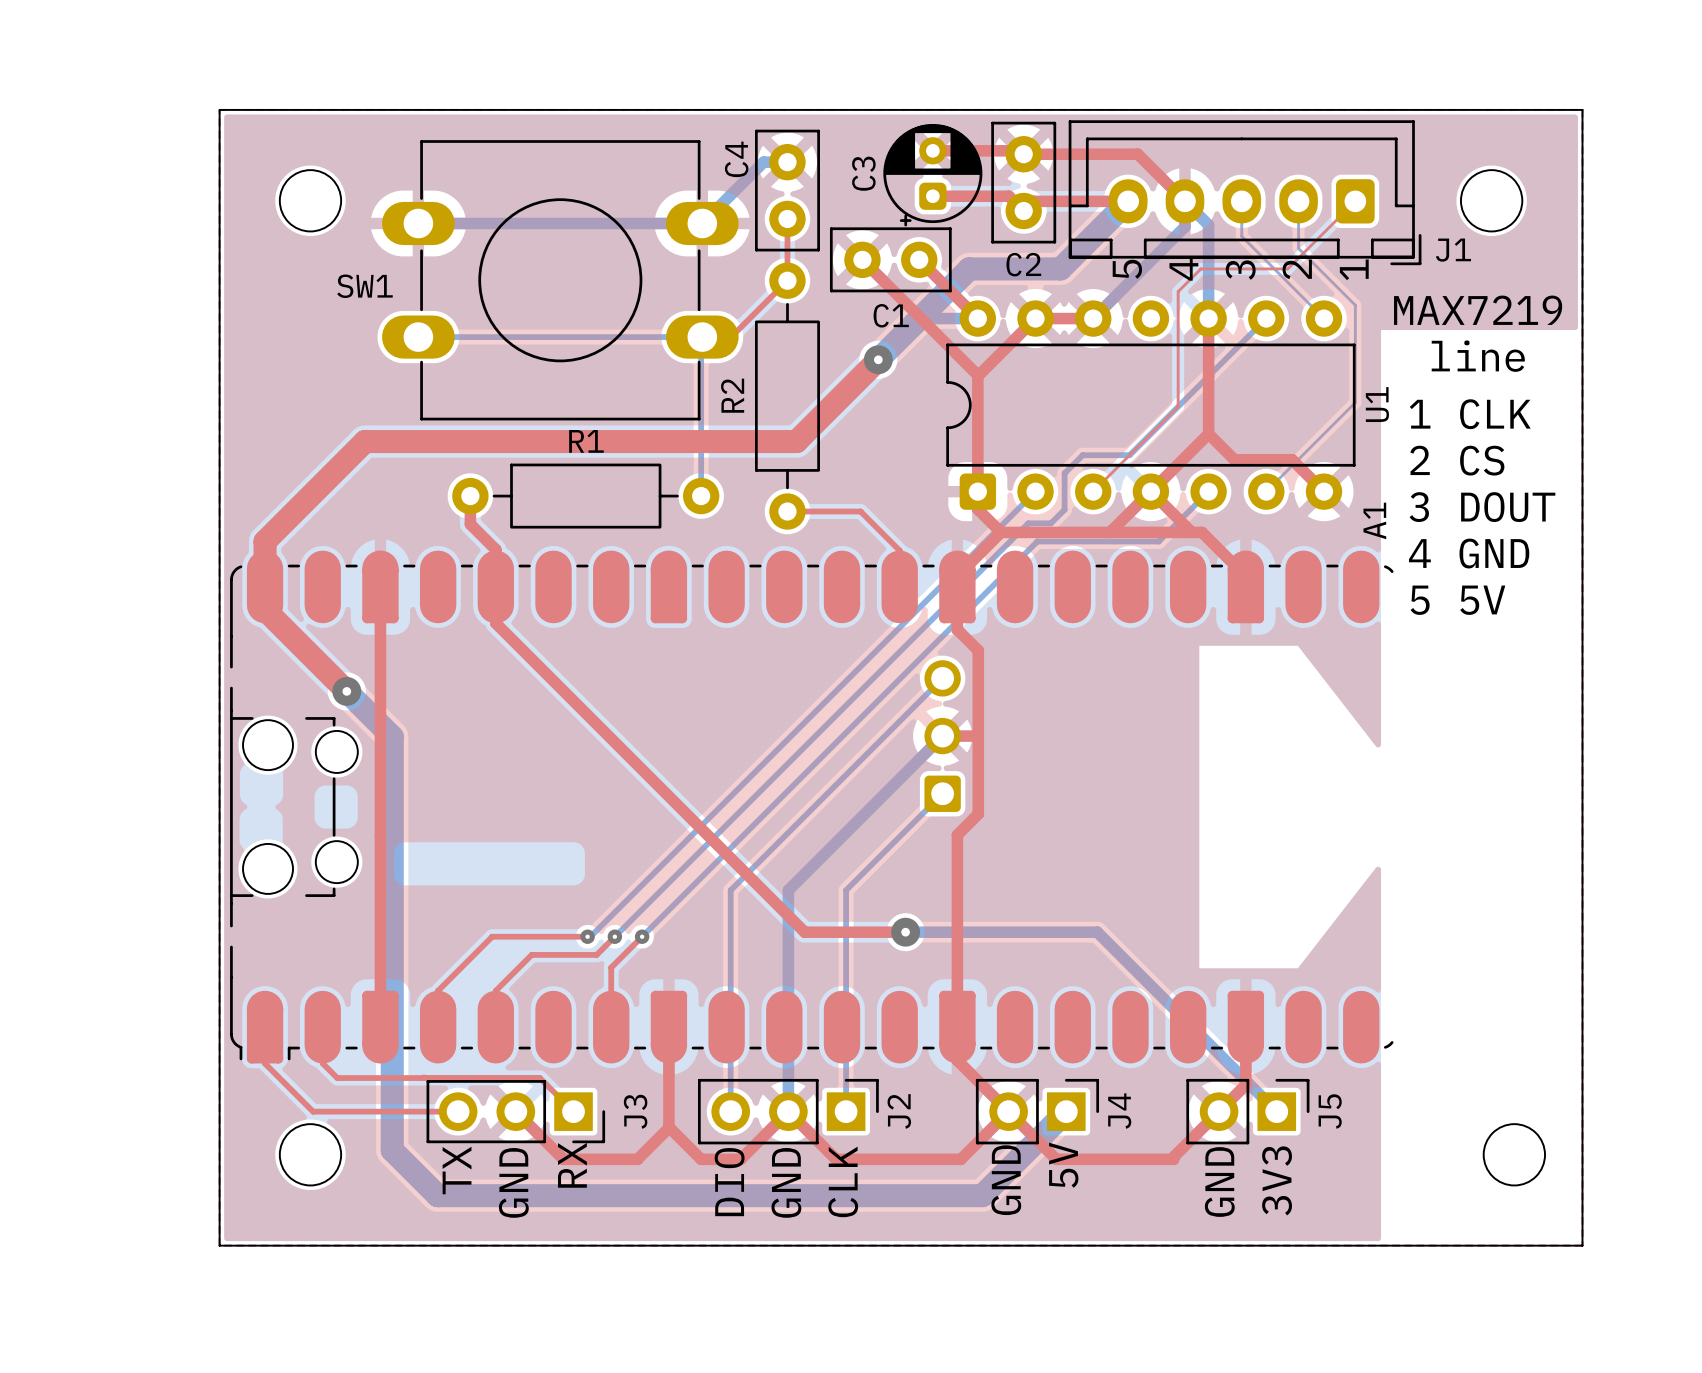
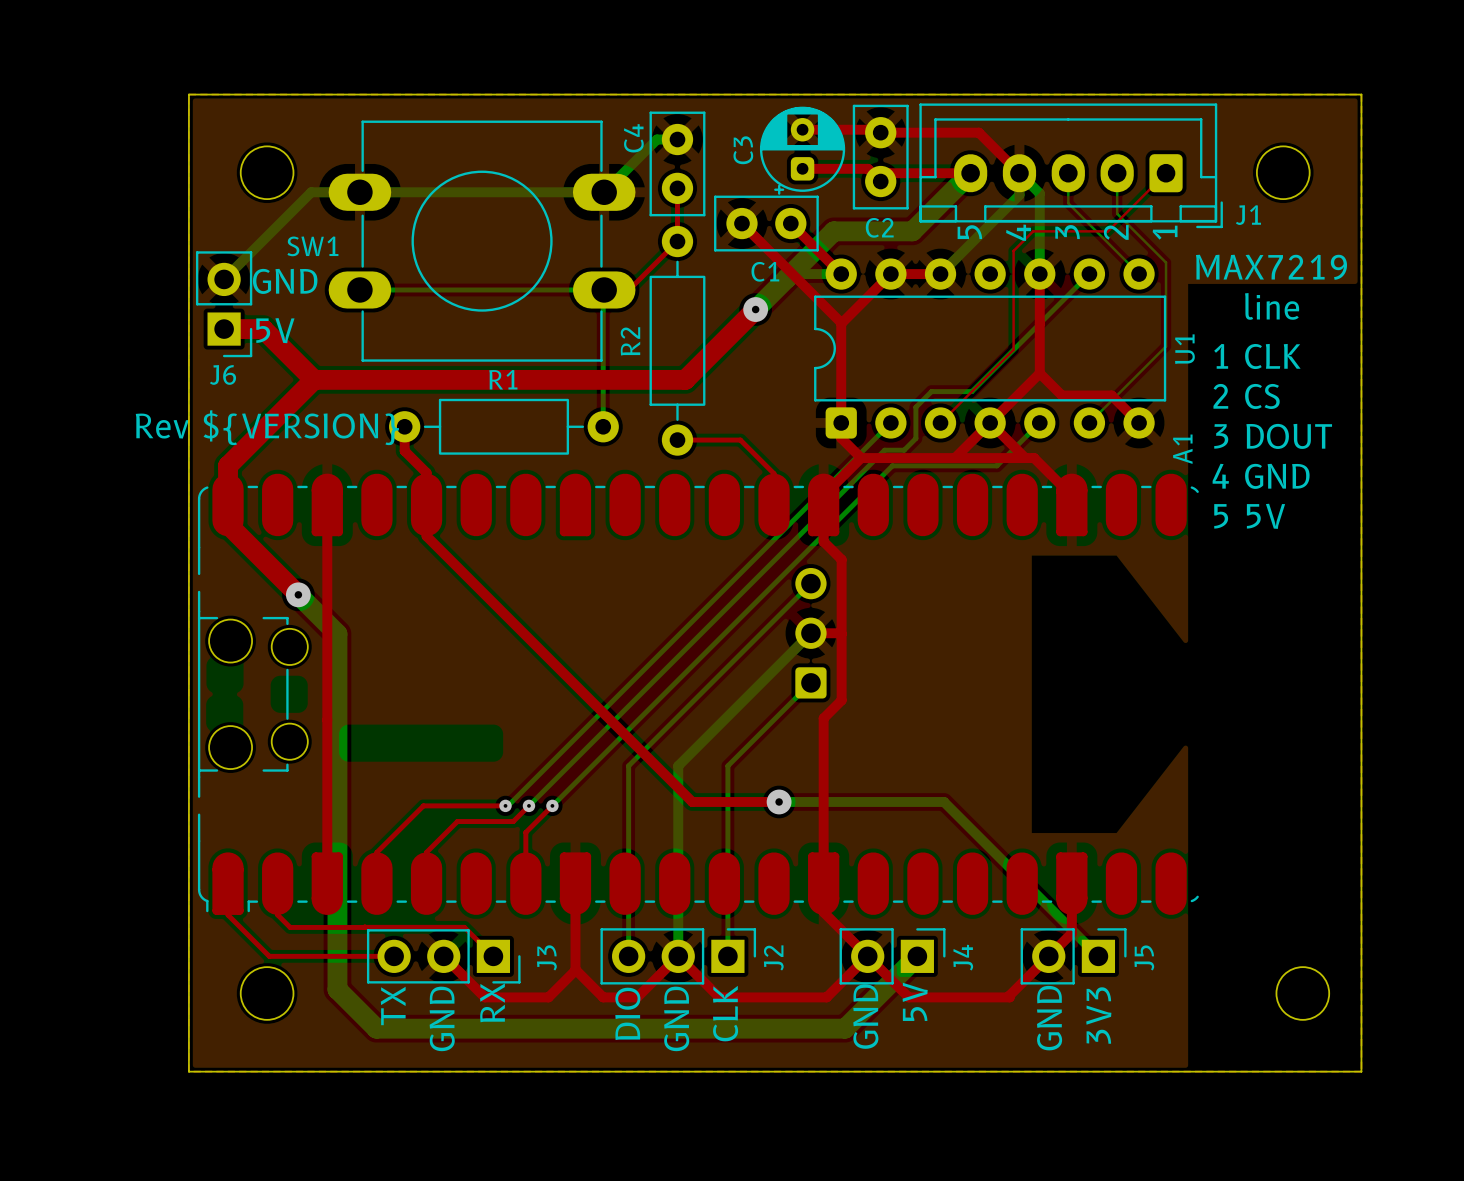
bottom track: none -> (359, 192) (311, 192) (224, 279)
text: none -> GND (285, 281)
J6: none -> (224, 304)
top track: none -> (224, 329) (263, 329) (314, 379)
text: none -> 5V (275, 330)
text: none -> Rev ${VERSION} (267, 427)

